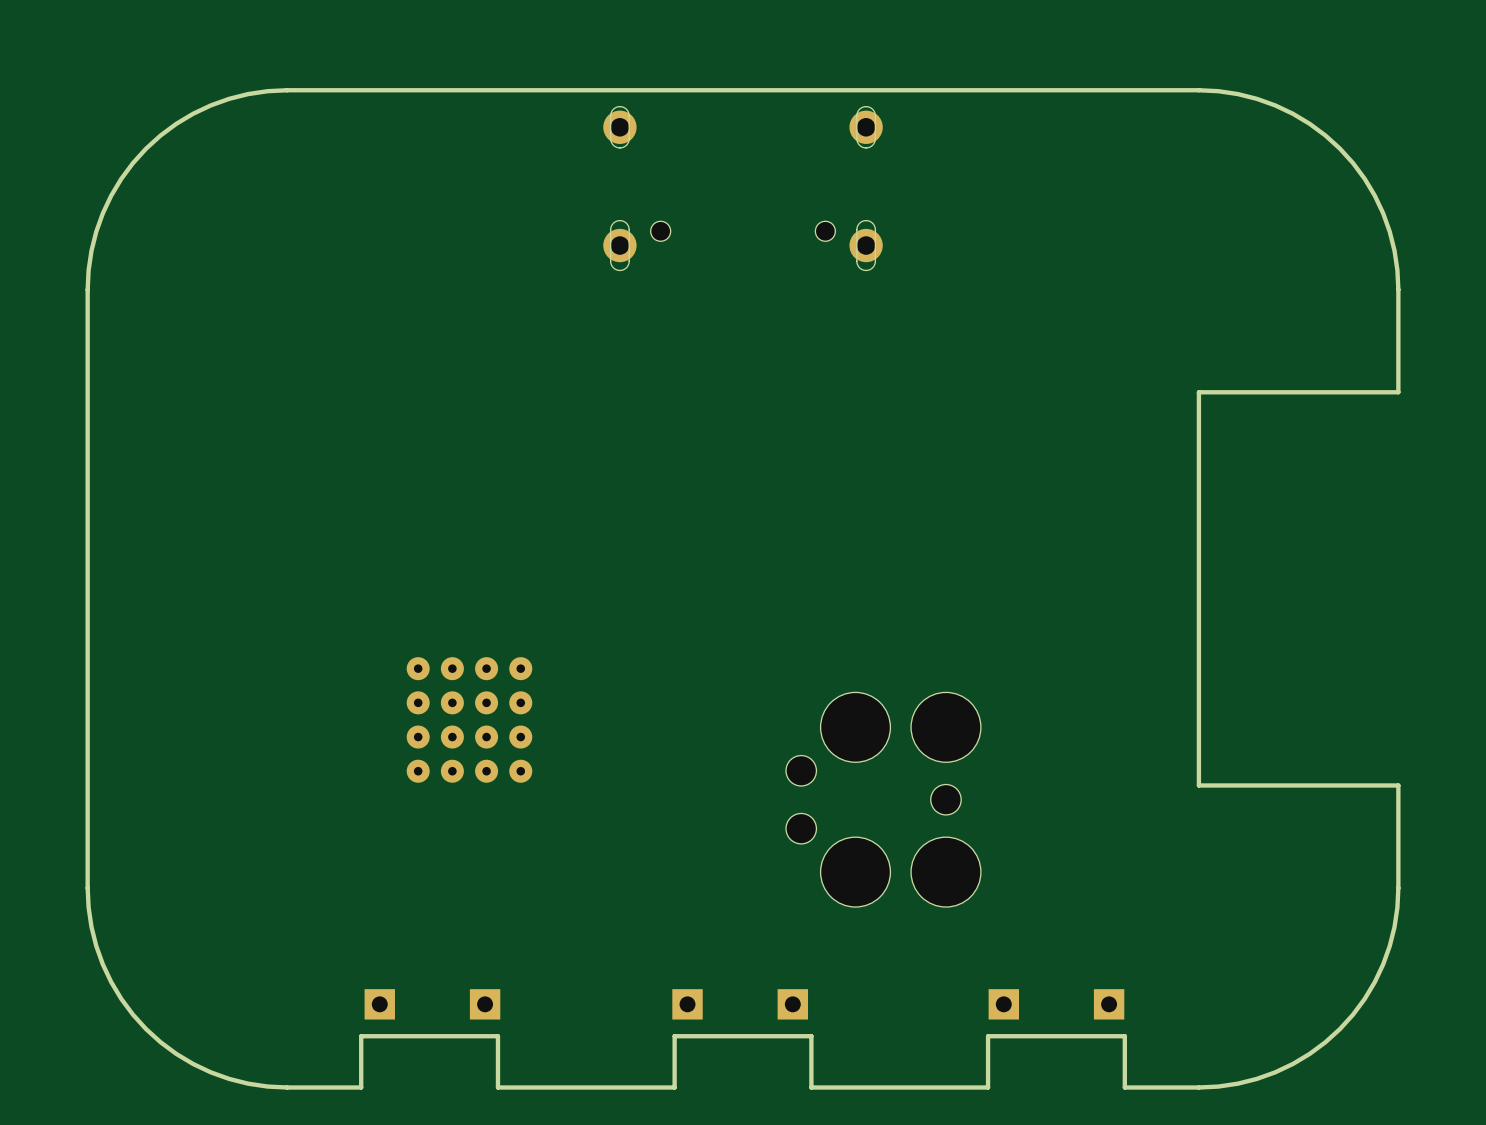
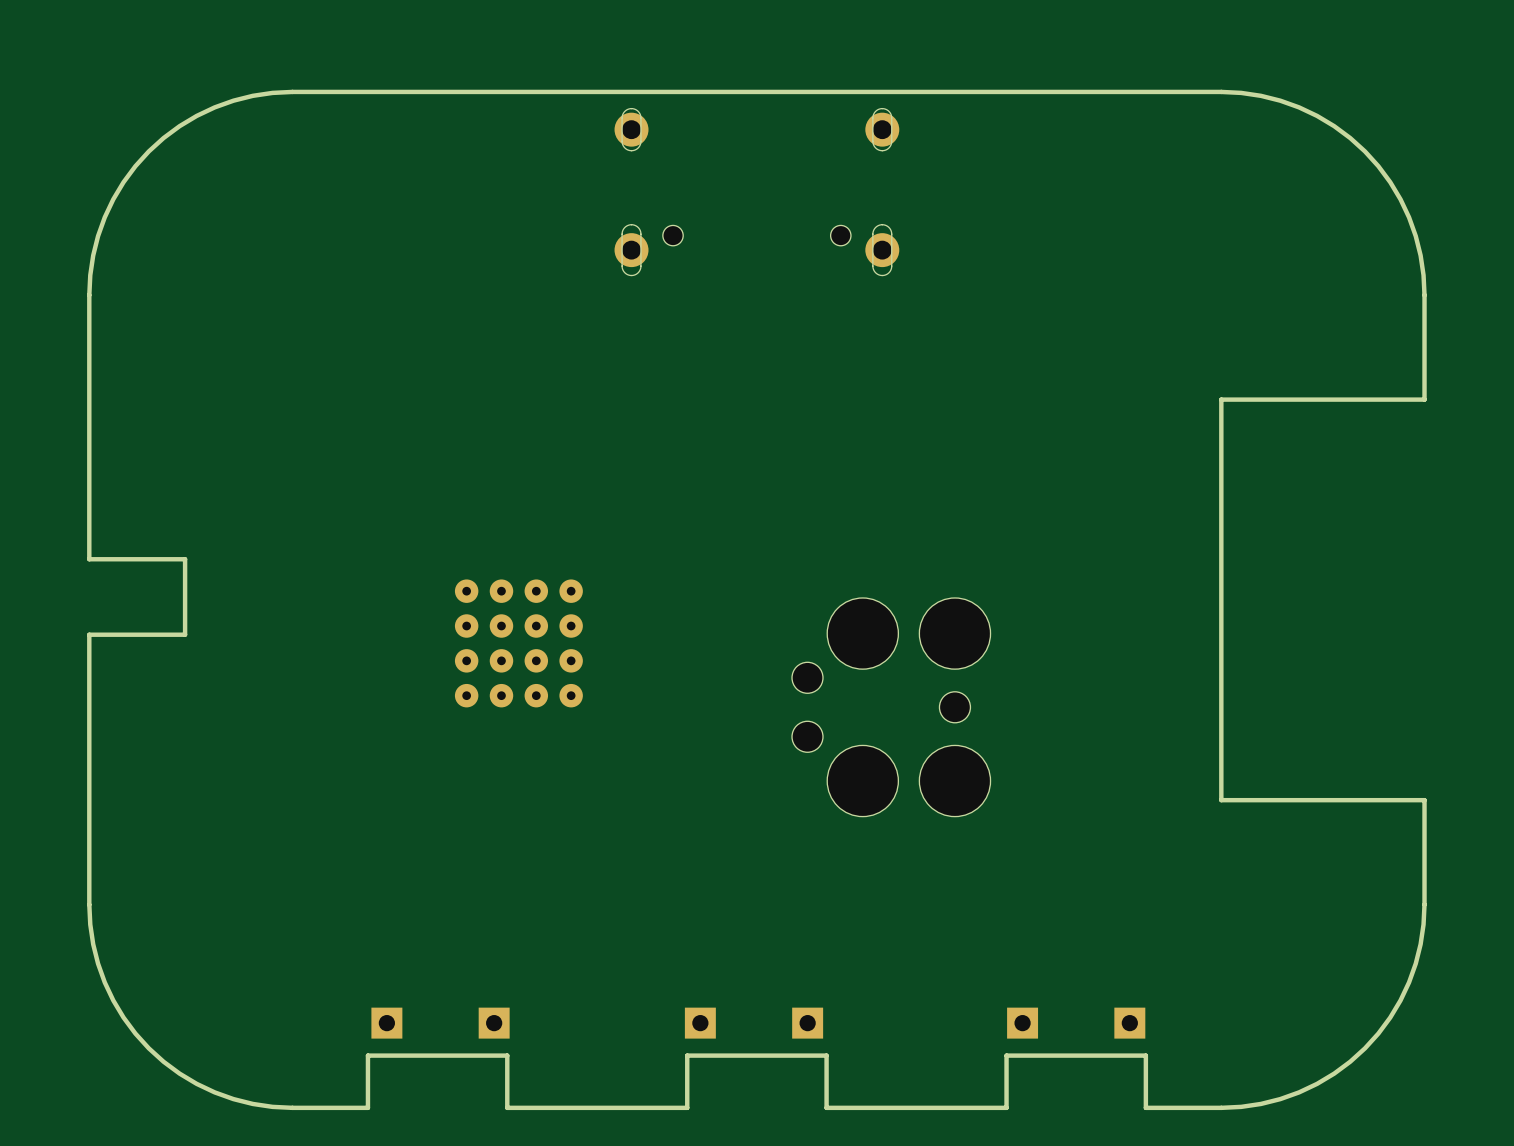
board edge: (87, 548) (87, 623) -> (89, 559) (185, 559) (185, 634) (89, 634)
part position: (469, 719) -> (518, 643)
part position: (883, 799) -> (891, 707)

